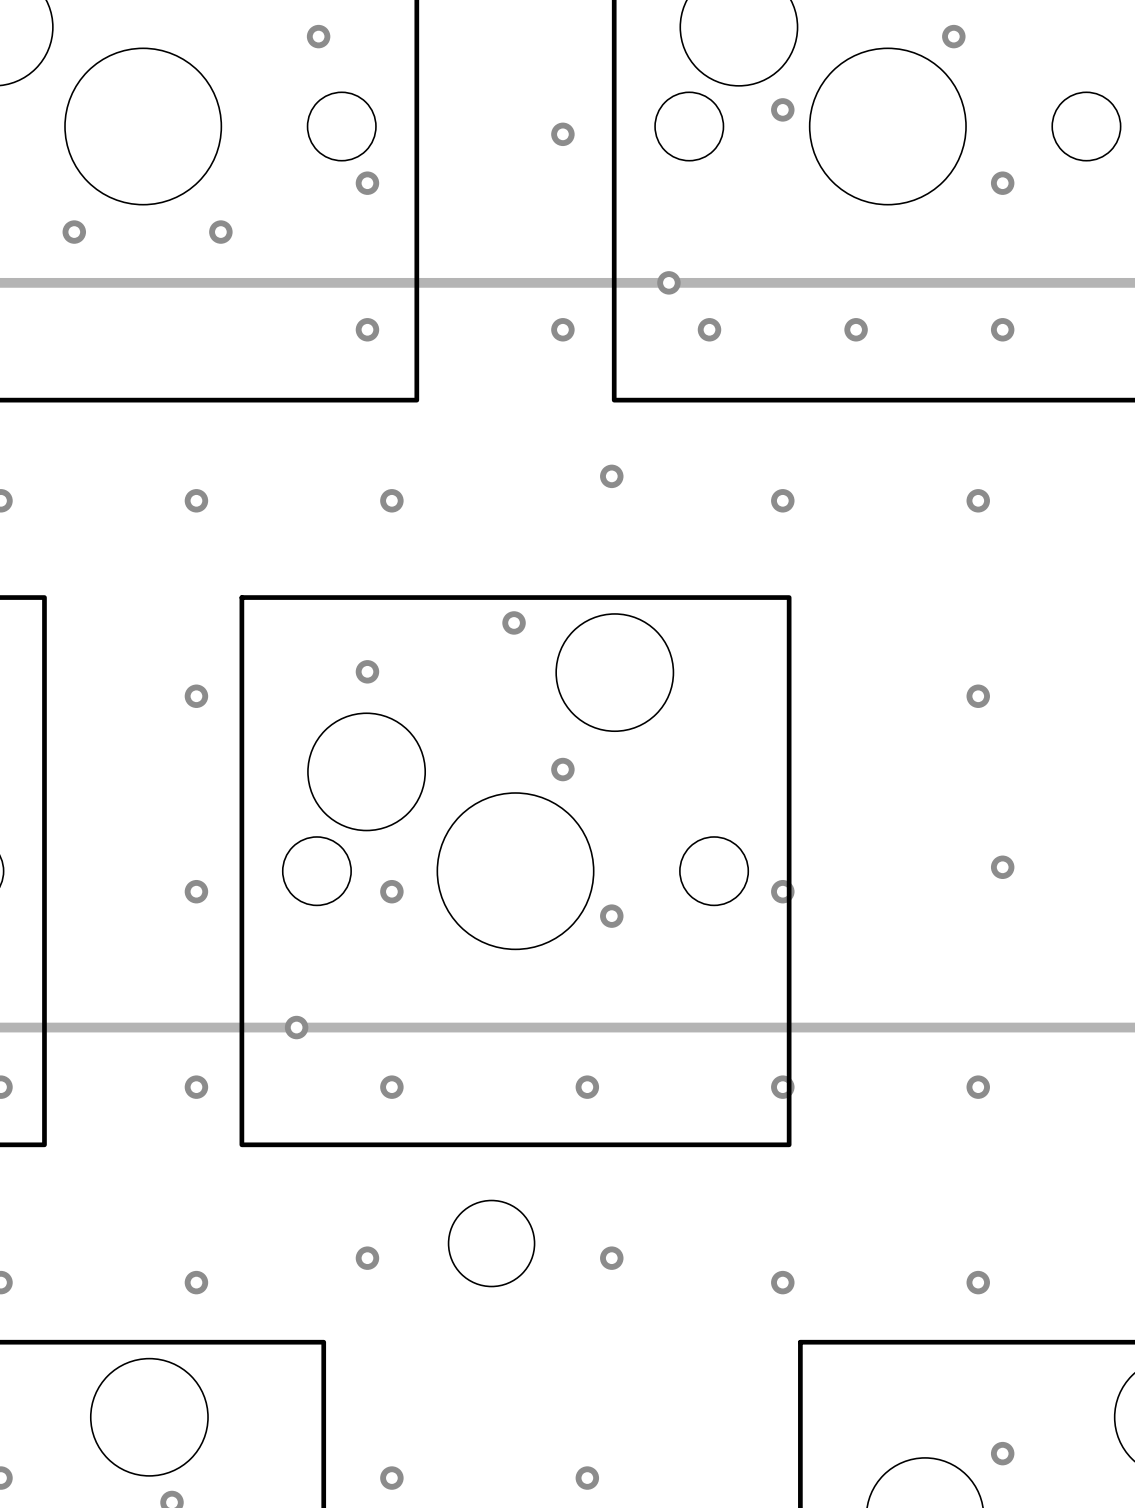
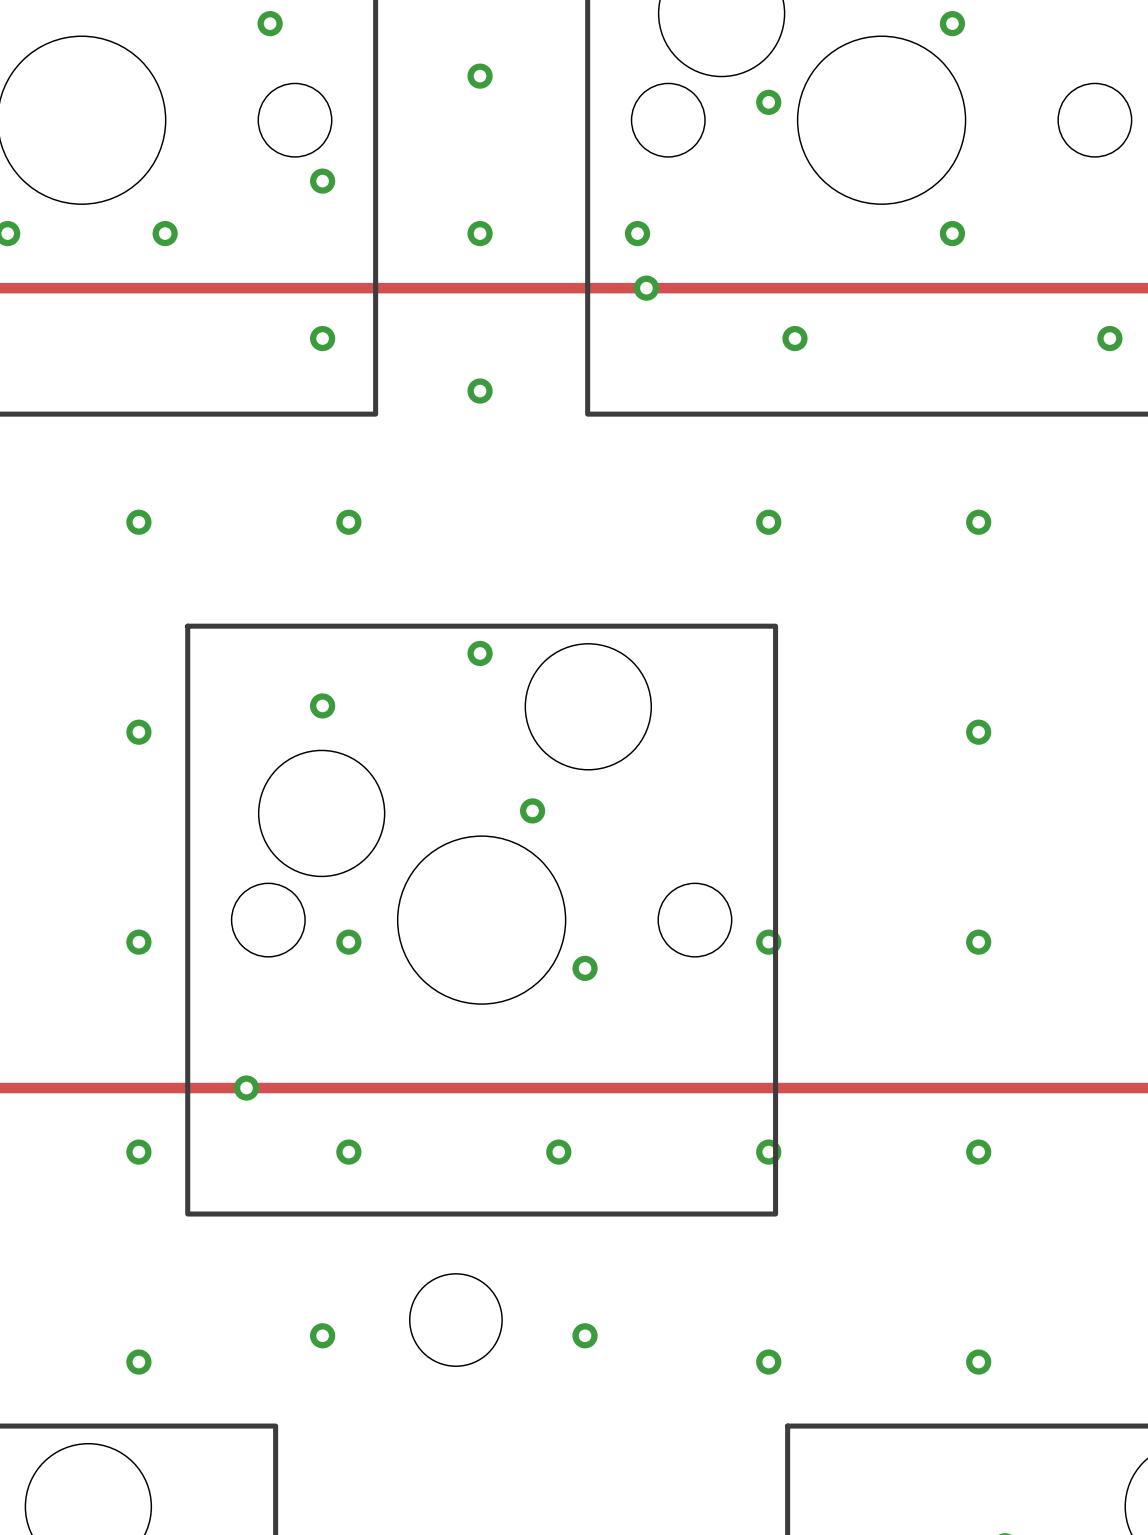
via: none -> (480, 76)
via: (562, 134) -> none
via: (1002, 183) -> none
via: none -> (480, 233)
via: none -> (637, 233)
via: none -> (952, 233)
via: (562, 329) -> none
via: (709, 329) -> none
via: none -> (794, 338)
via: (856, 329) -> none
via: (1002, 329) -> none
via: none -> (1109, 338)
via: none -> (480, 391)
via: (611, 476) -> none
via position: (1002, 867) -> (978, 942)

